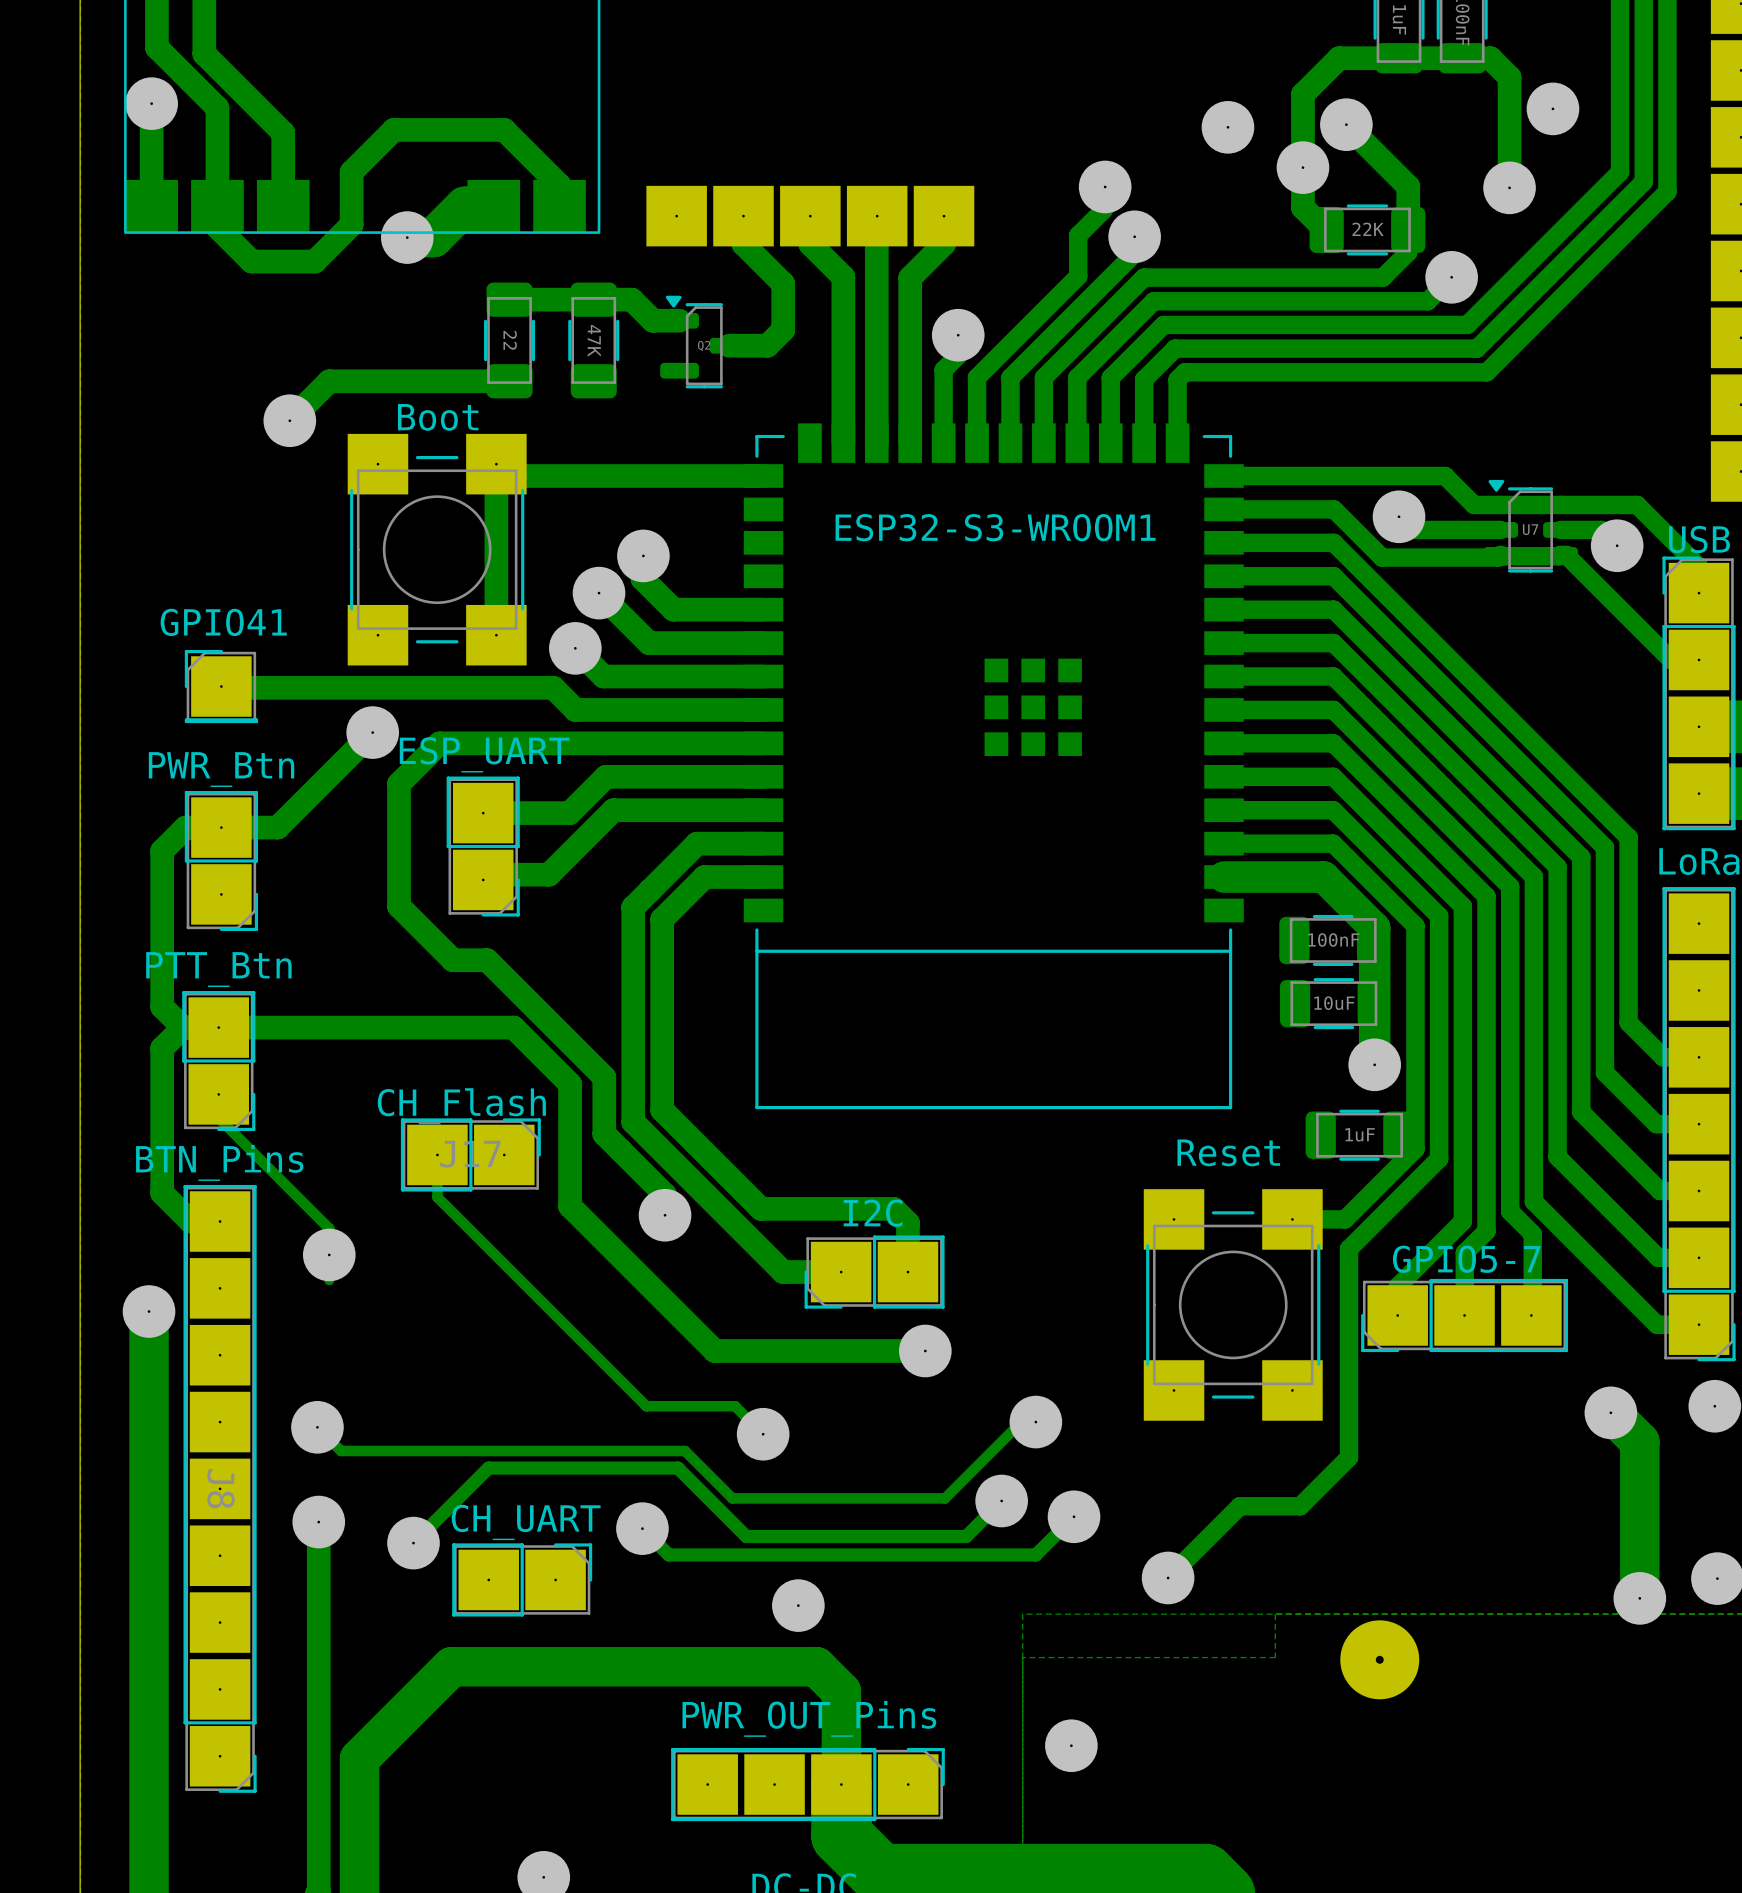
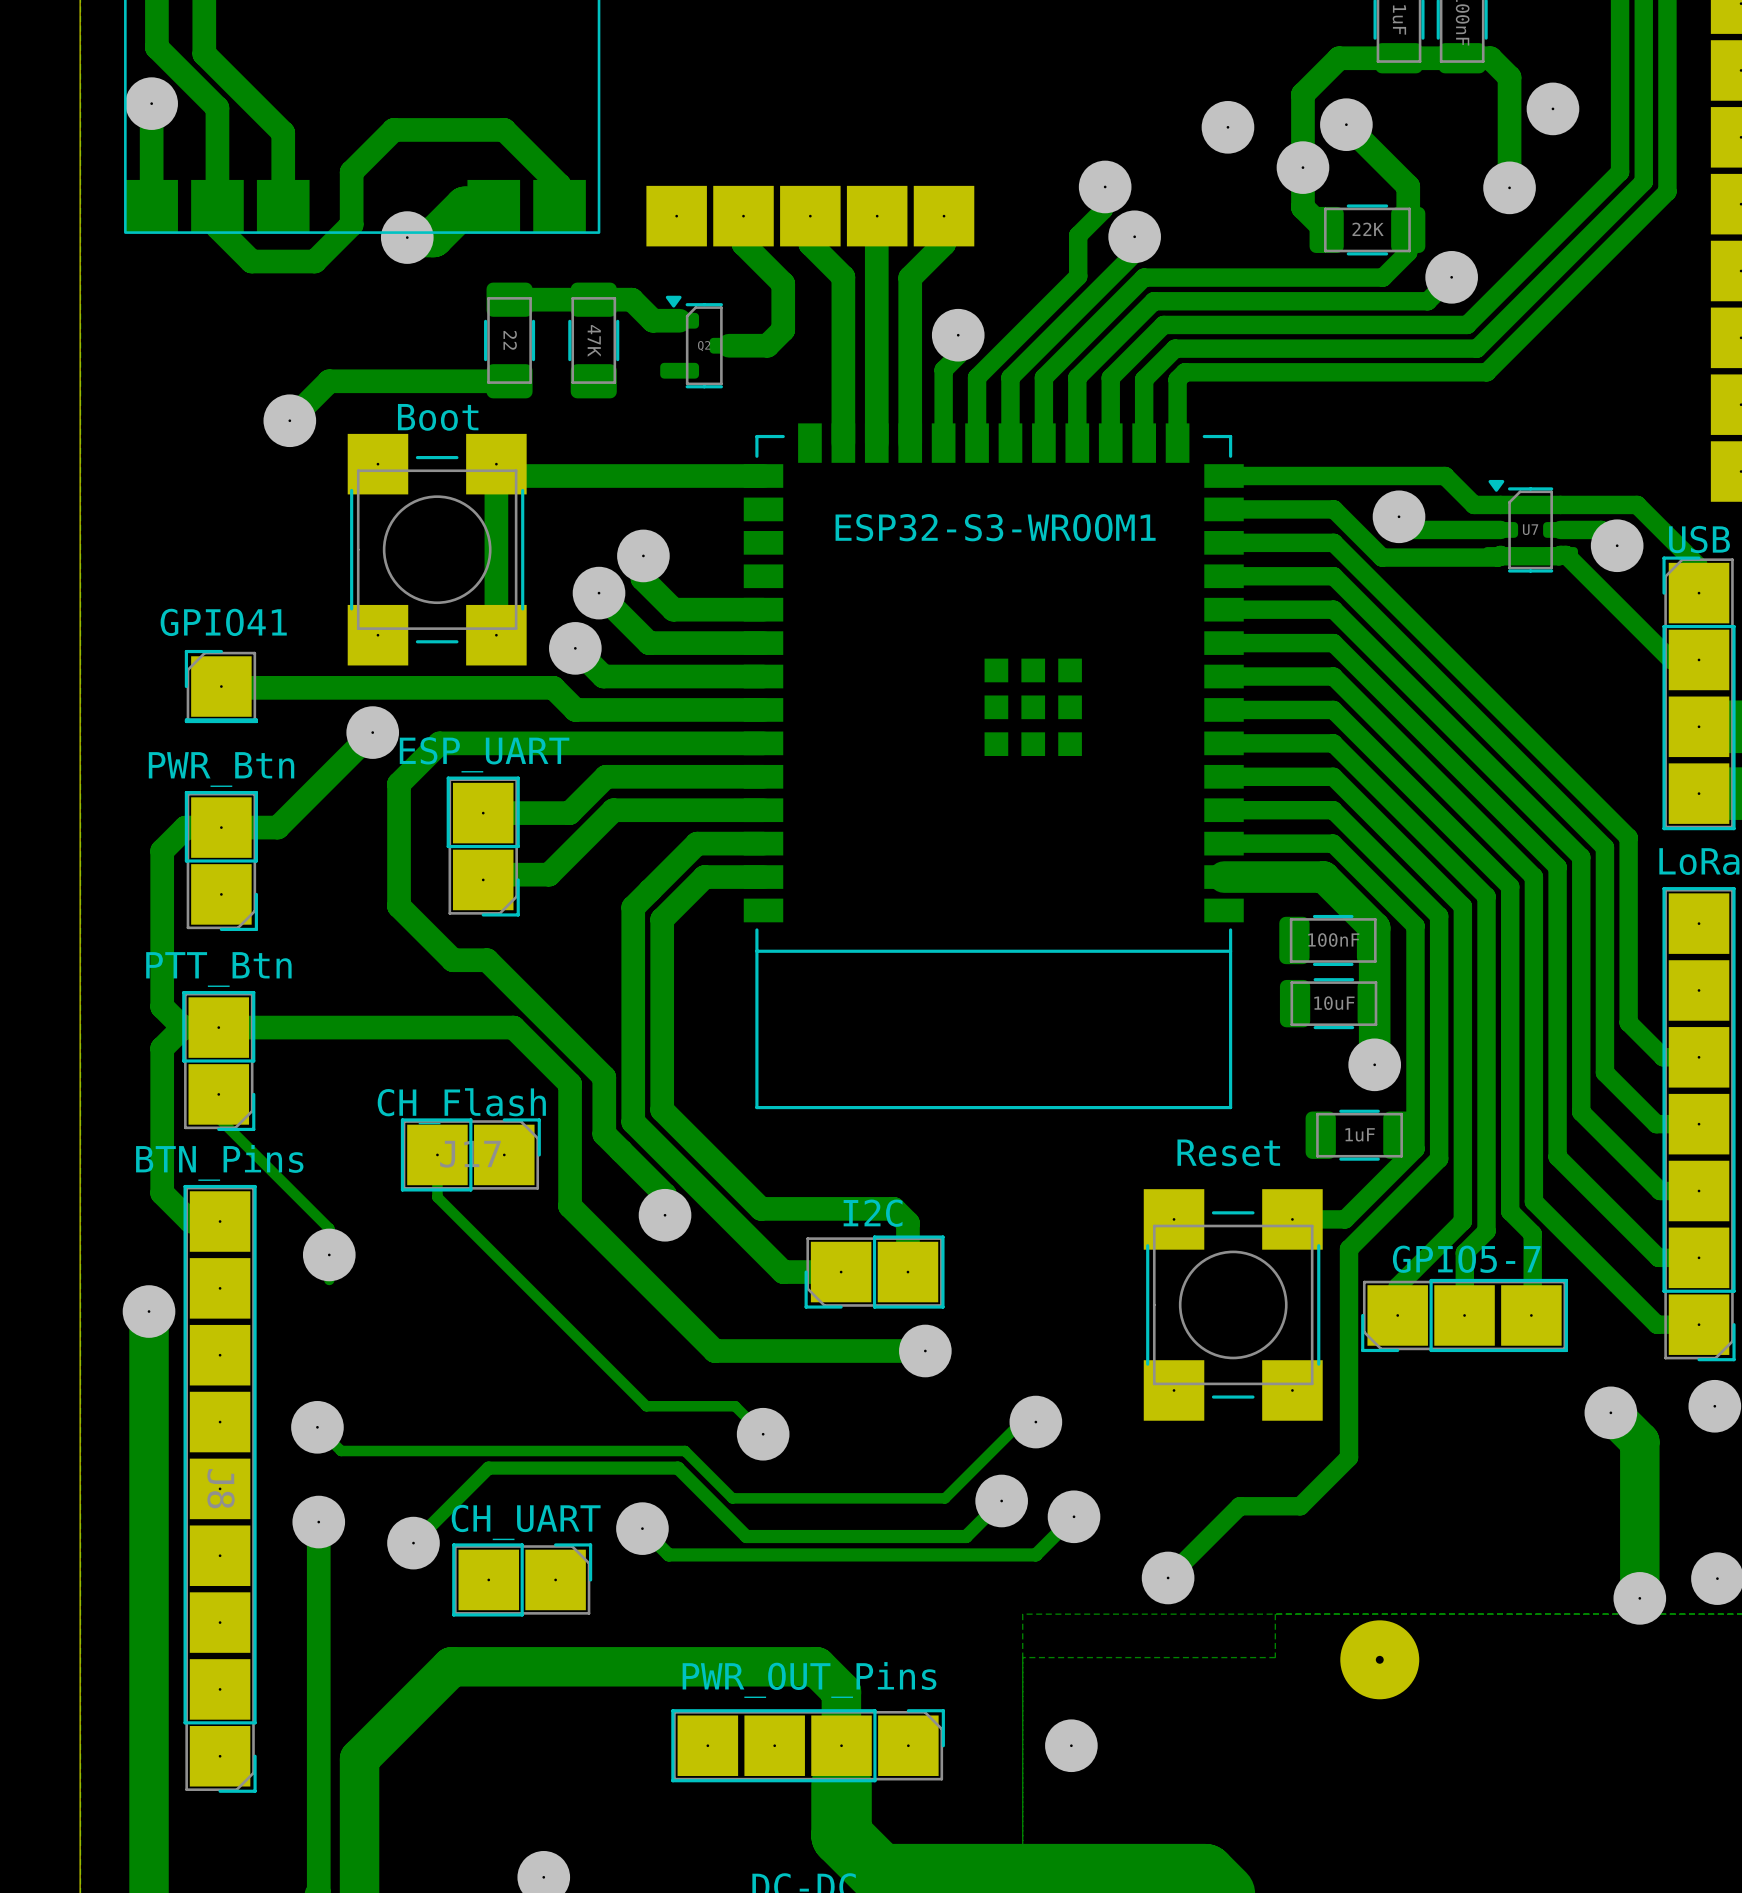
via: (798, 1605) -> none
part position: (807, 1784) -> (808, 1745)

